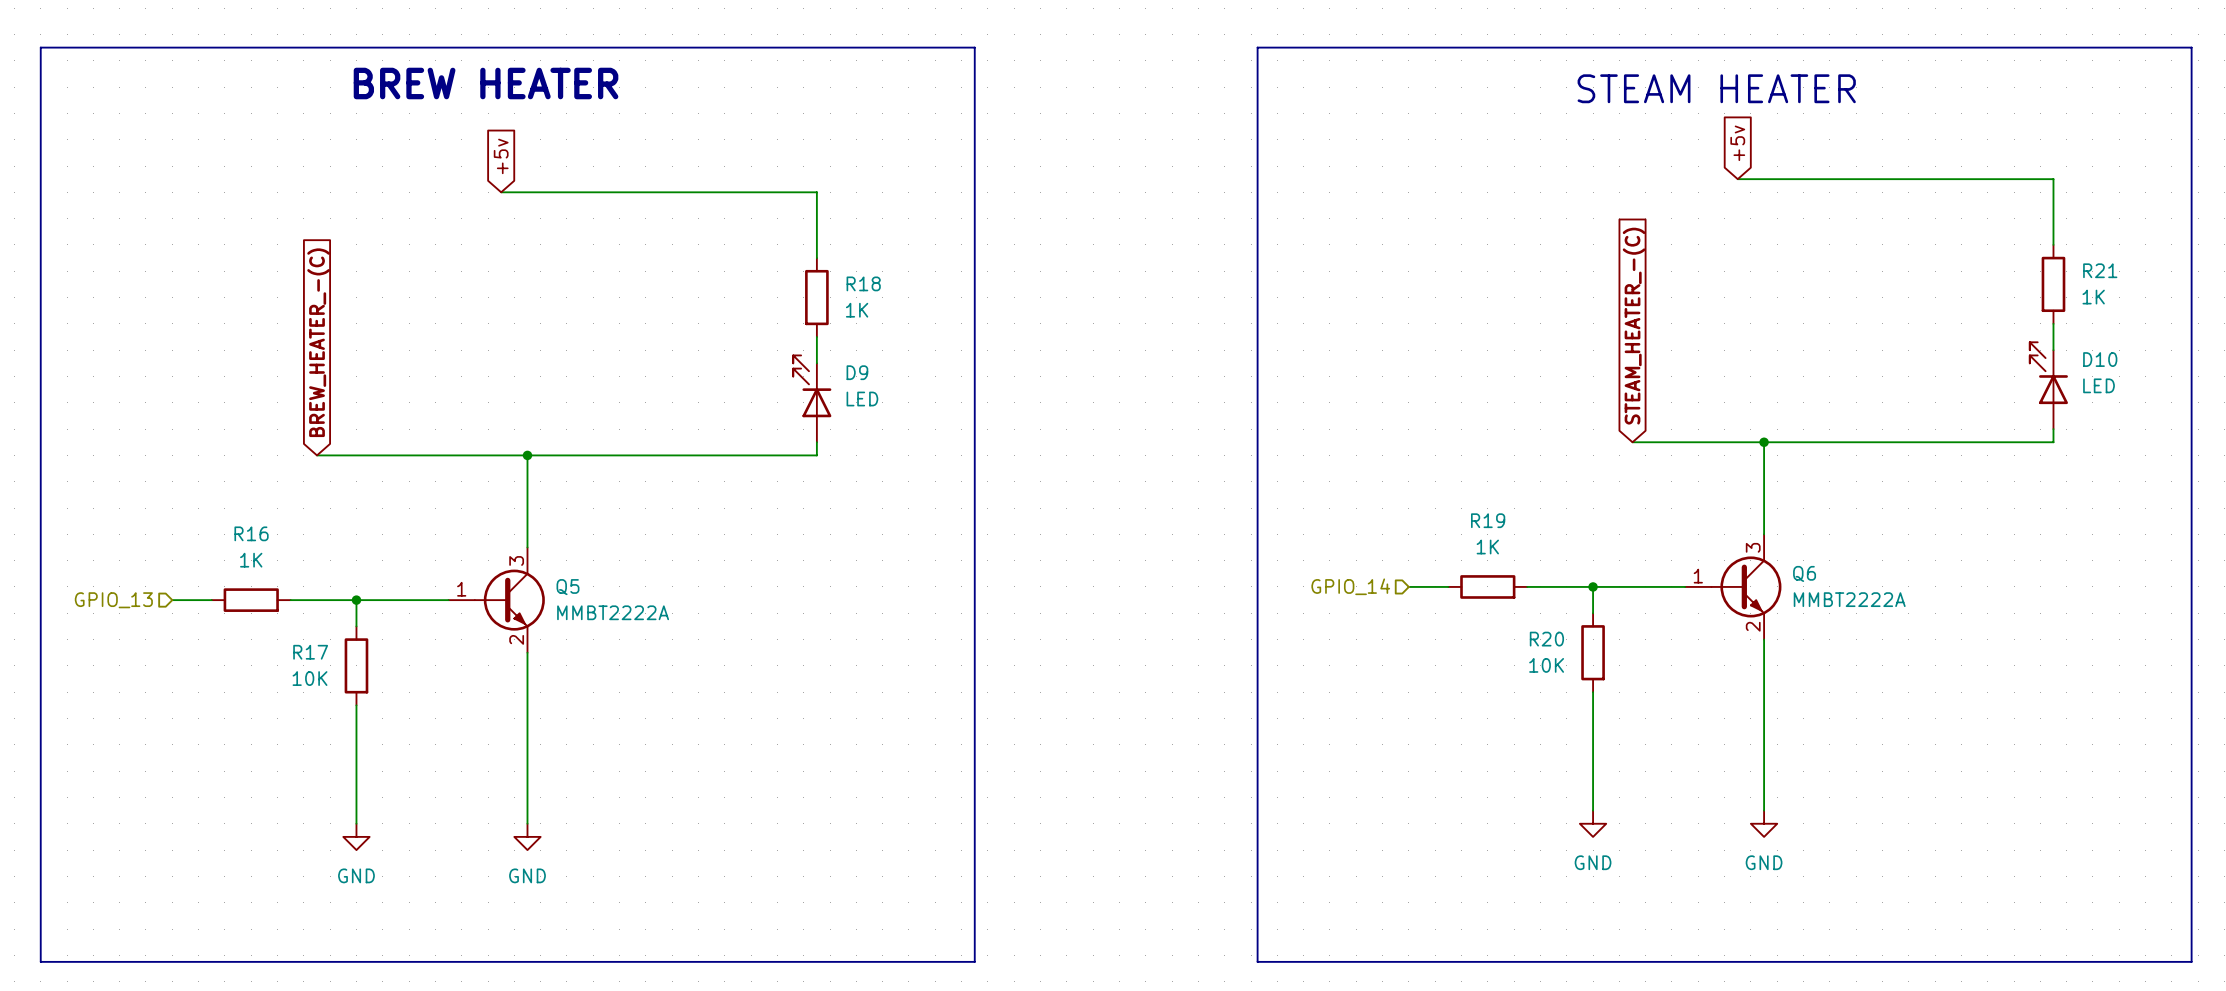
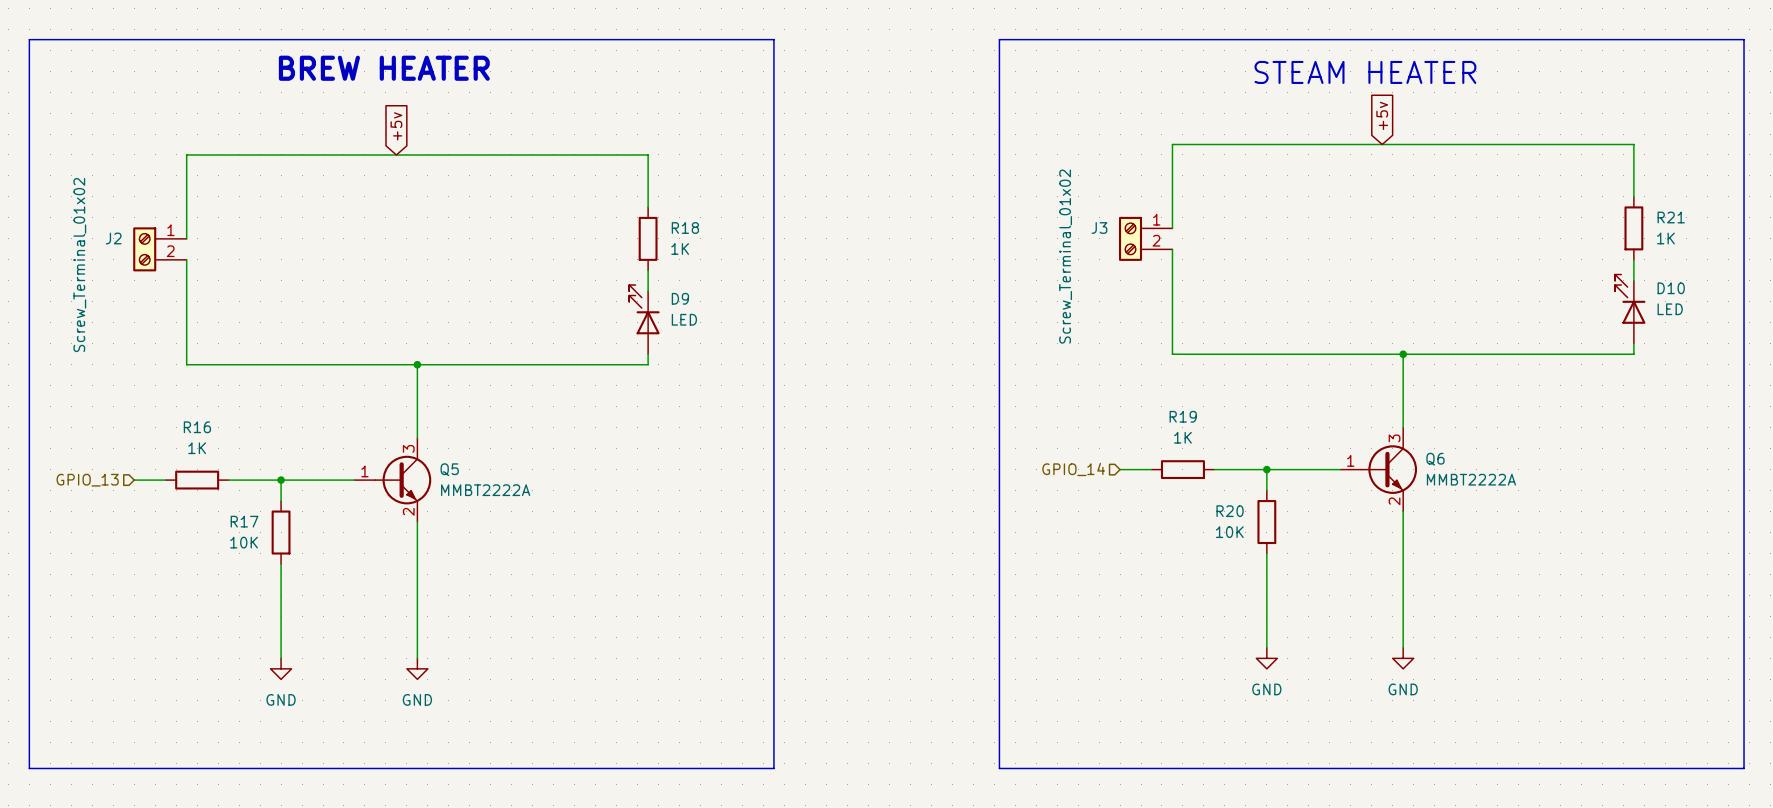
wire: none -> (1382, 144) (1172, 144) (1172, 228)
wire: none -> (396, 154) (186, 154) (186, 238)
J3: none -> Screw_Terminal_01x02 (1145, 238)
J2: none -> Screw_Terminal_01x02 (159, 249)
wire: none -> (1172, 249) (1172, 354) (1298, 354)
wire: none -> (186, 259) (186, 364) (249, 364)
global label: STEAM_HEATER_-(C) (1634, 326) -> none
global label: BREW_HEATER_-(C) (318, 342) -> none

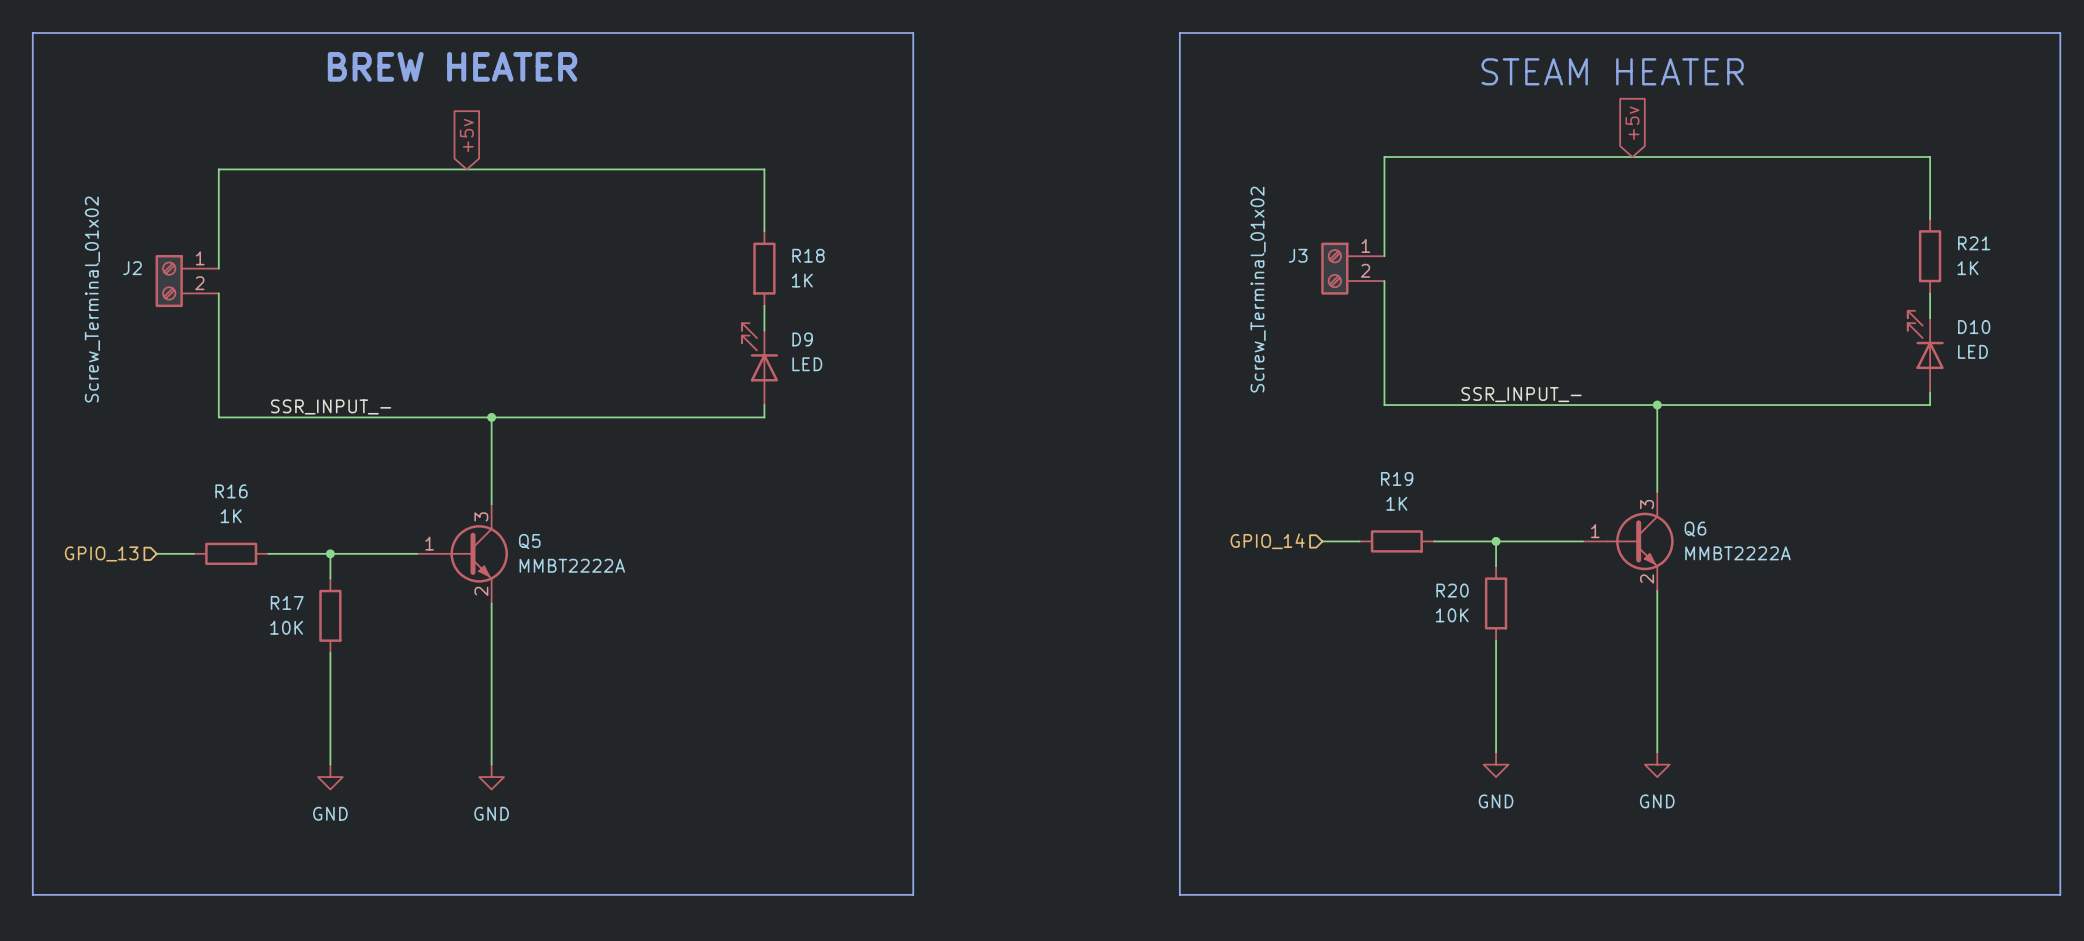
label: none -> SSR_INPUT_- (1521, 394)
label: none -> SSR_INPUT_- (331, 406)

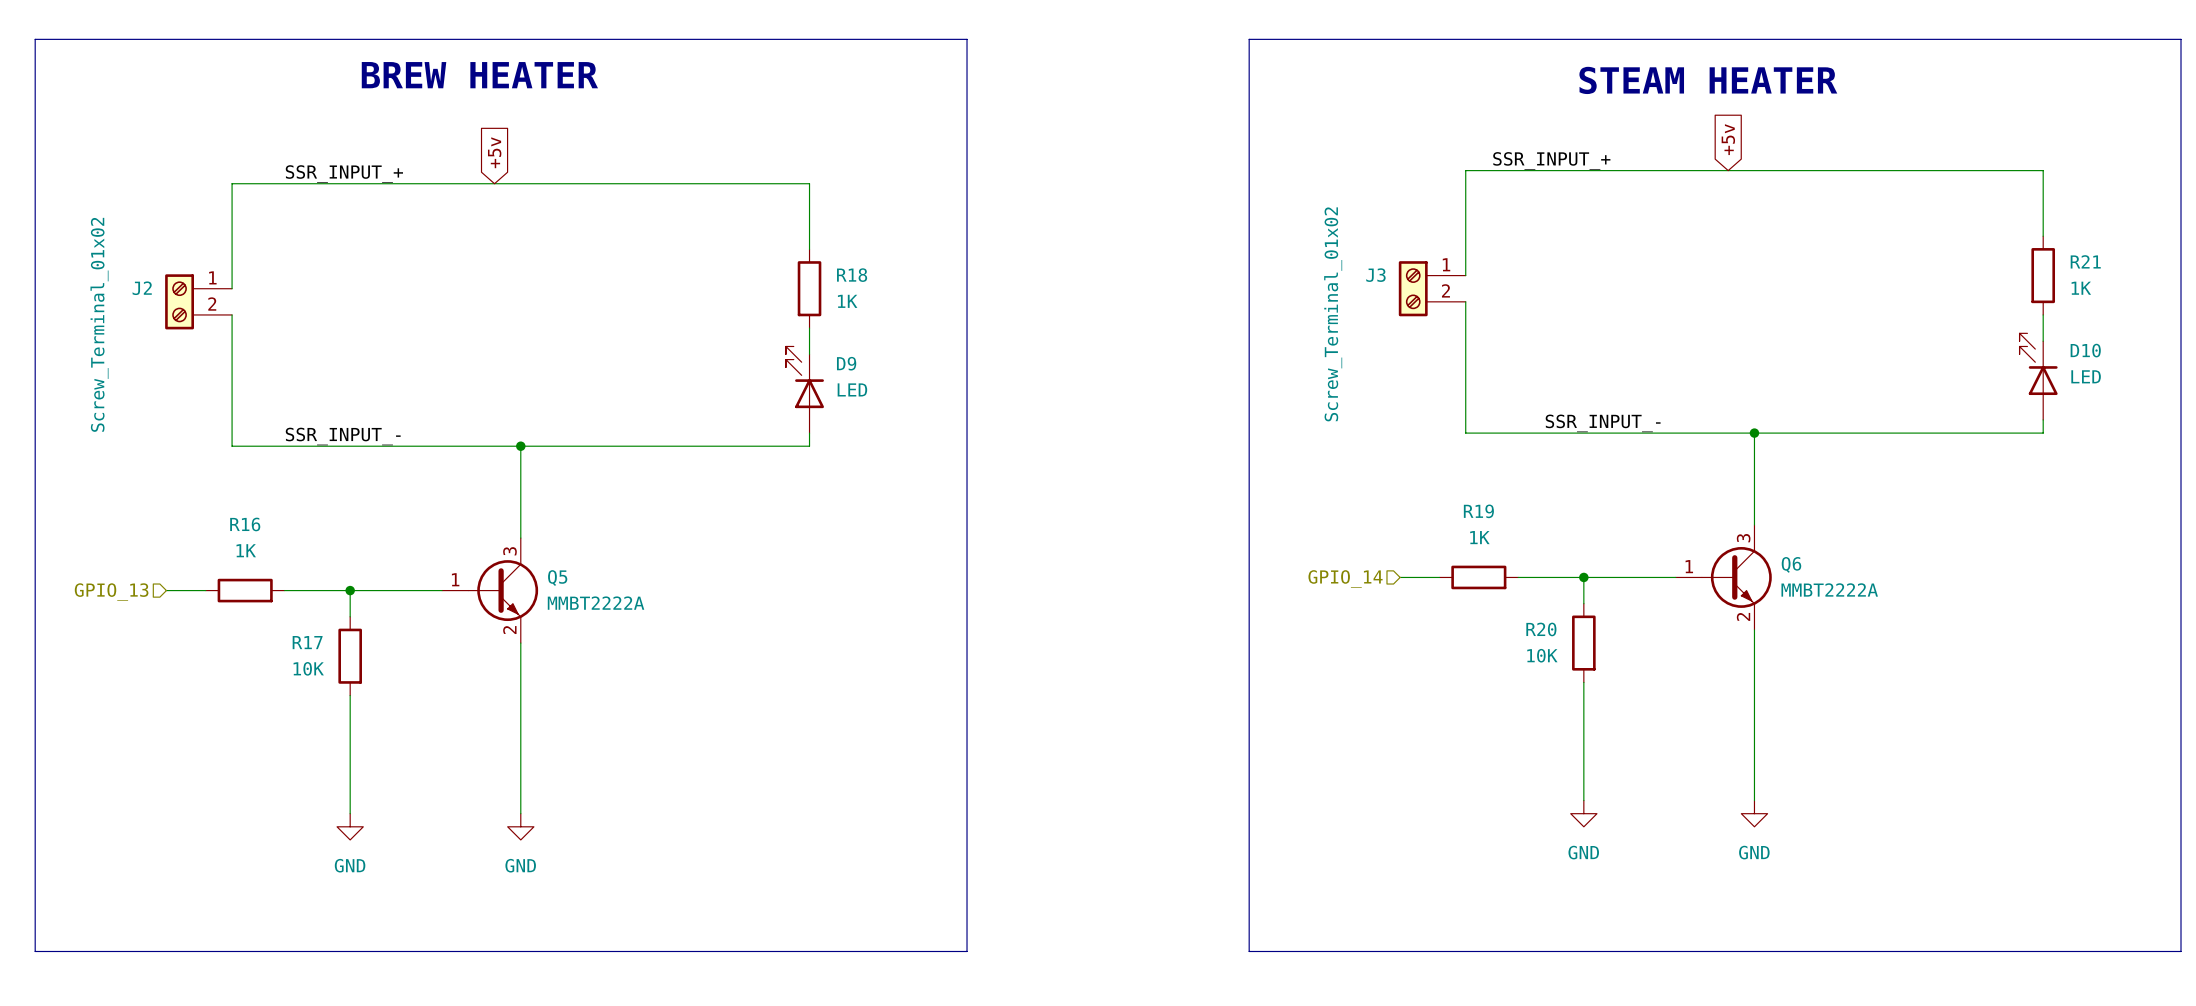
label: none -> SSR_INPUT_+ (1551, 160)
label: none -> SSR_INPUT_+ (344, 174)

